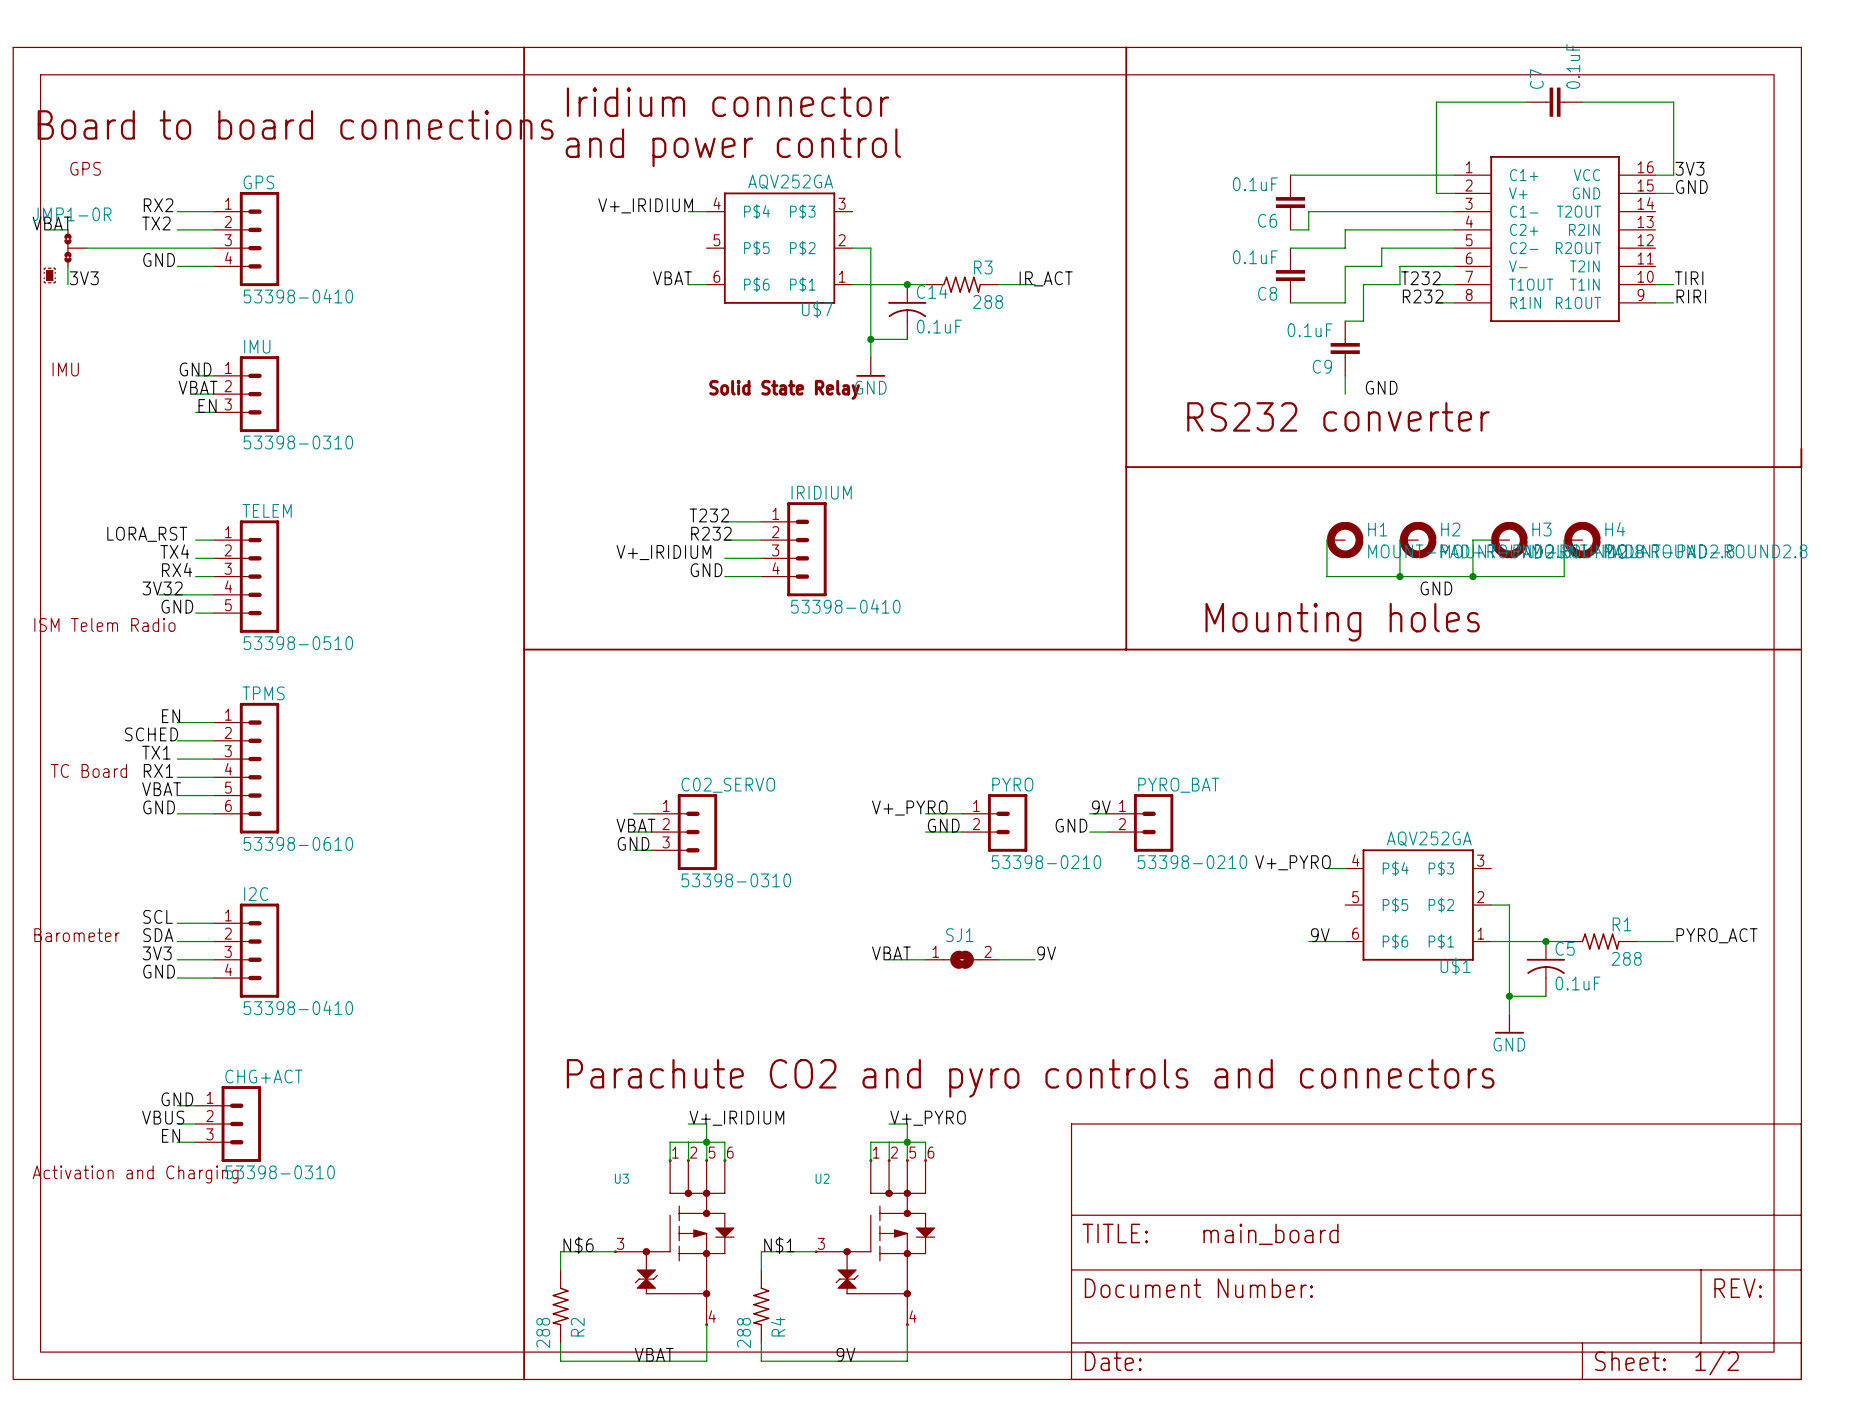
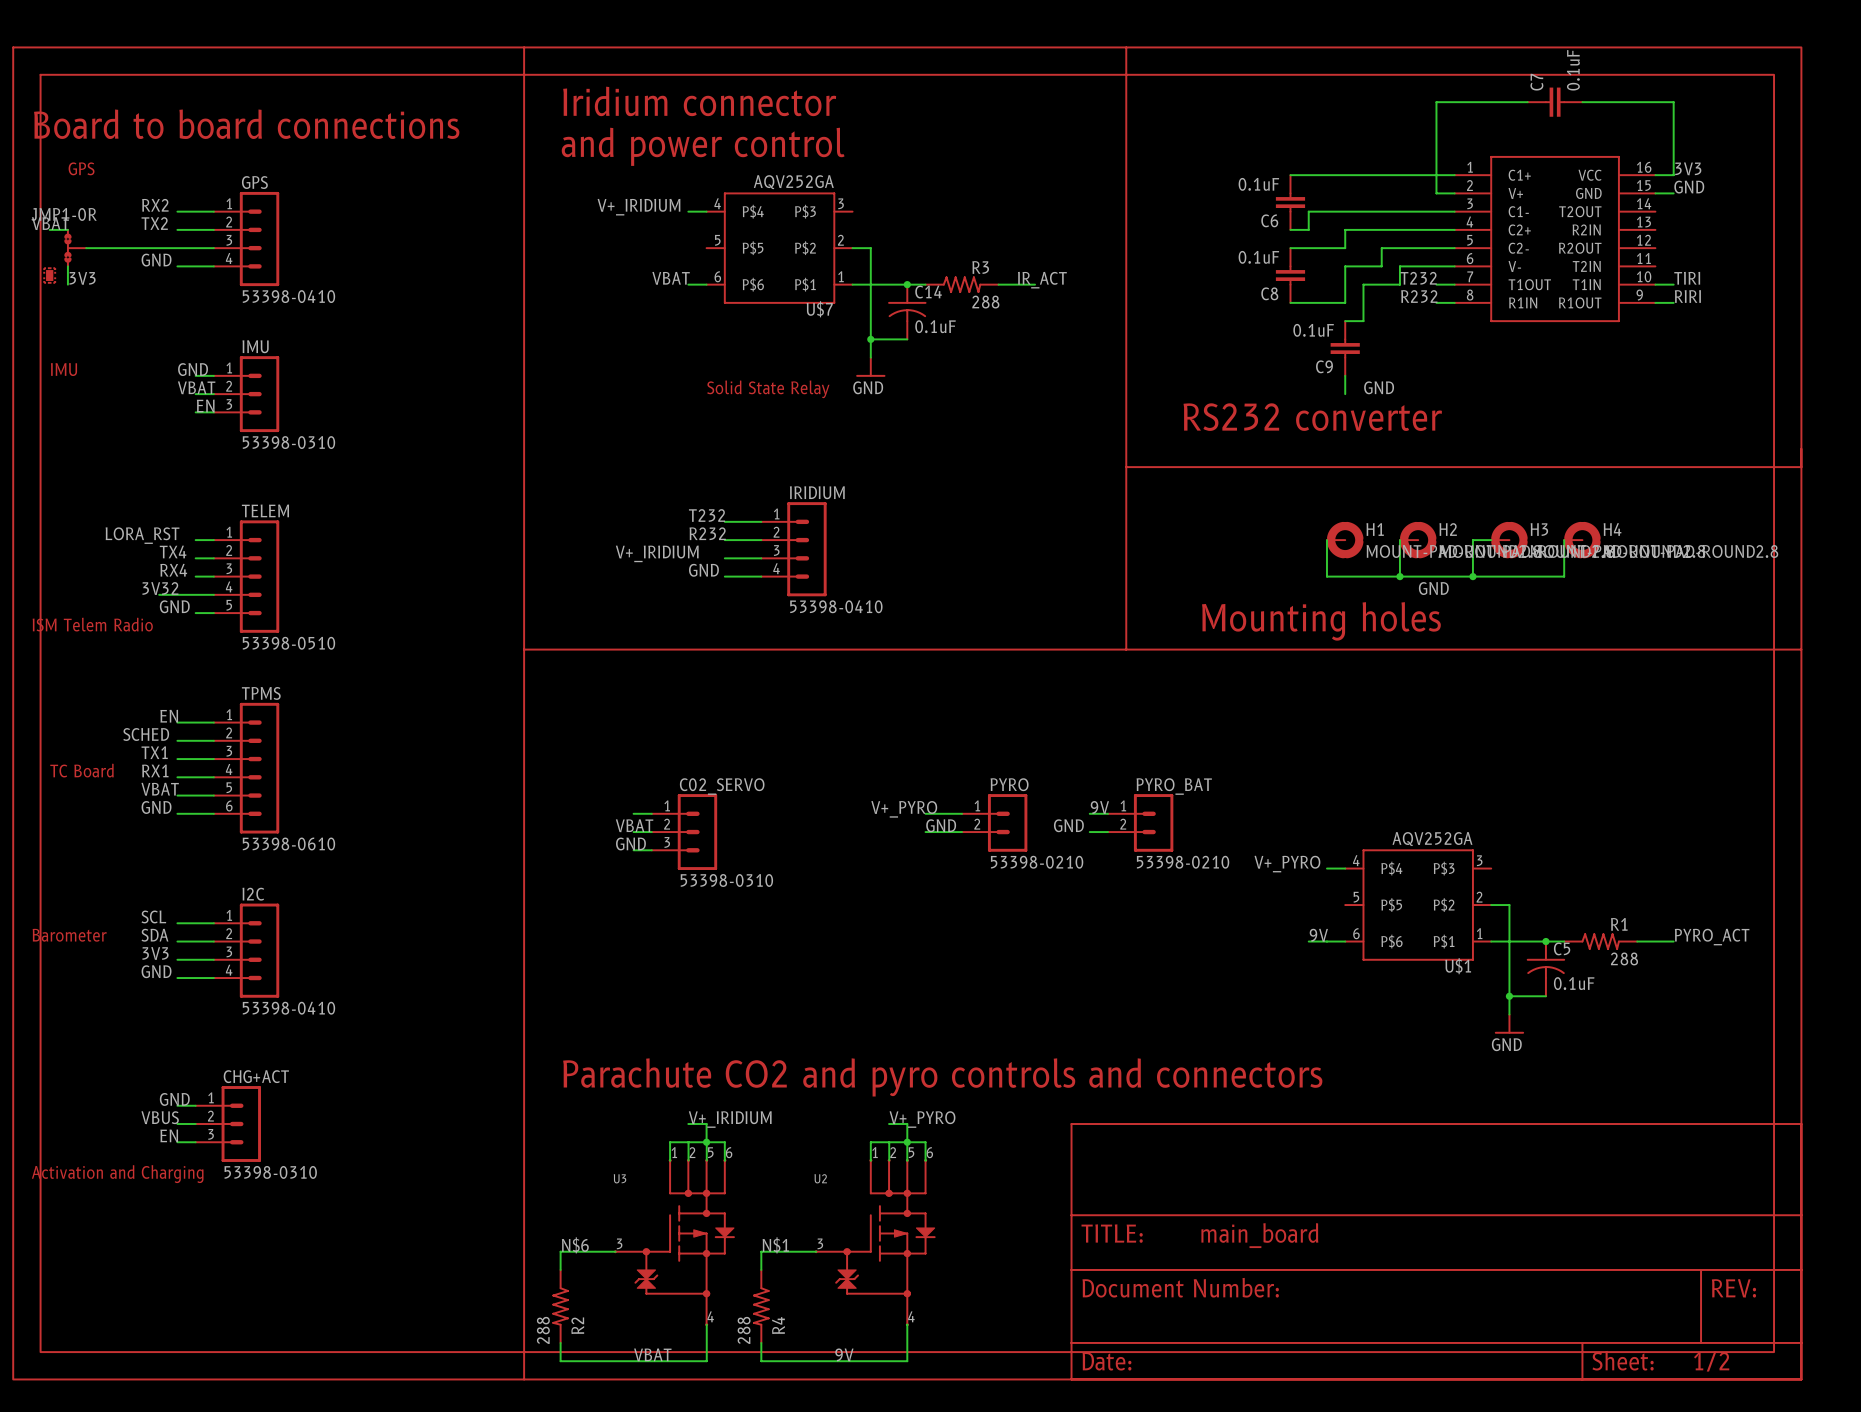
label: VBAT (891, 953) -> none
label: 9V (1046, 953) -> none
wire: (889, 959) (925, 959) -> none
SJ1: (962, 959) -> none
wire: (998, 959) (1035, 959) -> none

